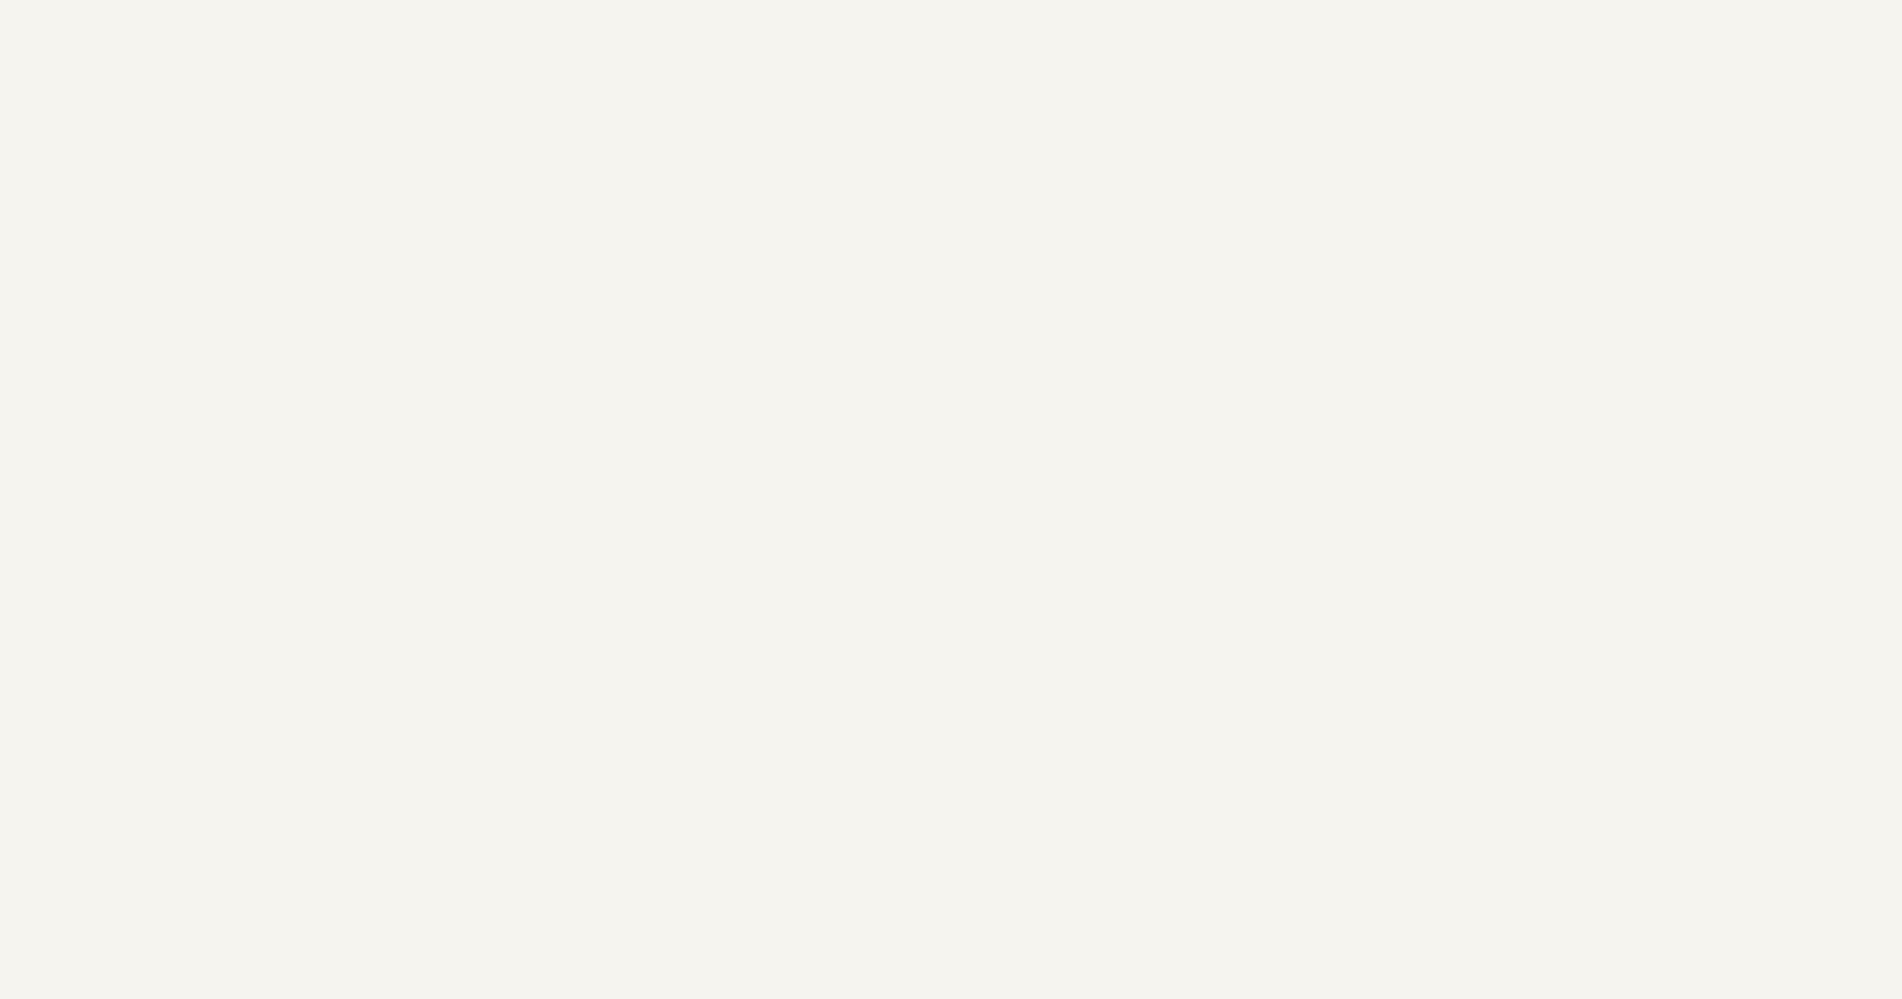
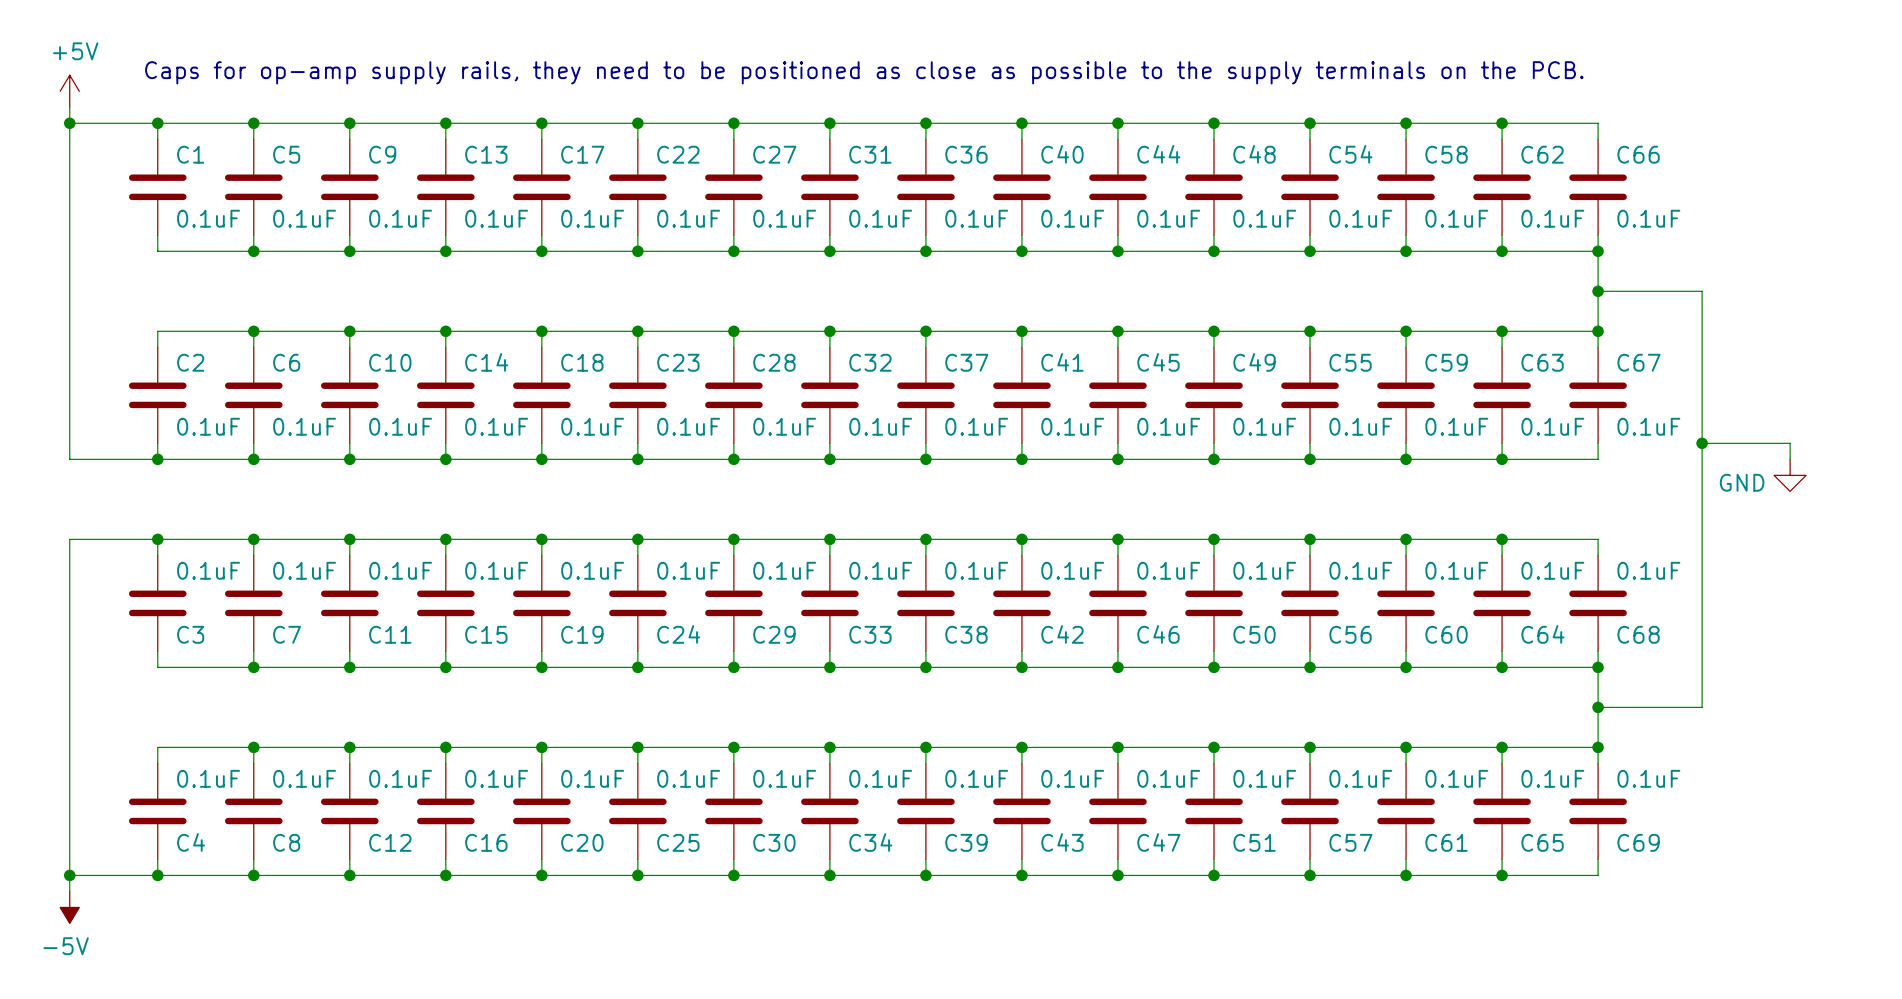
text: none -> Caps for op-amp supply rails, they need to be positioned as close as possible to the supply terminals on the PCB. (864, 72)
power symbol: none -> +5V (69, 91)
wire: none -> (69, 107) (69, 459) (1598, 459) (1598, 443)
wire: none -> (69, 123) (1598, 123) (1598, 139)
junction: none -> (69, 123)
wire: none -> (157, 123) (157, 139)
junction: none -> (157, 123)
wire: none -> (253, 123) (253, 139)
junction: none -> (253, 123)
wire: none -> (349, 123) (349, 139)
junction: none -> (349, 123)
wire: none -> (445, 123) (445, 139)
junction: none -> (445, 123)
wire: none -> (541, 123) (541, 139)
junction: none -> (541, 123)
wire: none -> (637, 123) (637, 139)
junction: none -> (637, 123)
wire: none -> (733, 123) (733, 139)
junction: none -> (733, 123)
wire: none -> (829, 123) (829, 139)
junction: none -> (829, 123)
wire: none -> (925, 123) (925, 139)
junction: none -> (925, 123)
wire: none -> (1021, 123) (1021, 139)
junction: none -> (1021, 123)
wire: none -> (1117, 123) (1117, 139)
junction: none -> (1117, 123)
wire: none -> (1213, 123) (1213, 139)
junction: none -> (1213, 123)
wire: none -> (1310, 123) (1310, 139)
junction: none -> (1310, 123)
wire: none -> (1406, 123) (1406, 139)
junction: none -> (1406, 123)
wire: none -> (1502, 123) (1502, 139)
junction: none -> (1502, 123)
C1: none -> 0.1uF (157, 187)
C5: none -> 0.1uF (253, 187)
C9: none -> 0.1uF (349, 187)
C13: none -> 0.1uF (445, 187)
C17: none -> 0.1uF (541, 187)
C22: none -> 0.1uF (637, 187)
C27: none -> 0.1uF (733, 187)
C31: none -> 0.1uF (829, 187)
C36: none -> 0.1uF (925, 187)
C40: none -> 0.1uF (1021, 187)
C44: none -> 0.1uF (1117, 187)
C48: none -> 0.1uF (1213, 187)
C54: none -> 0.1uF (1310, 187)
C58: none -> 0.1uF (1406, 187)
C62: none -> 0.1uF (1502, 187)
C66: none -> 0.1uF (1598, 187)
wire: none -> (157, 235) (157, 251) (1598, 251)
wire: none -> (253, 235) (253, 251)
wire: none -> (349, 235) (349, 251)
wire: none -> (445, 235) (445, 251)
wire: none -> (541, 235) (541, 251)
wire: none -> (637, 235) (637, 251)
wire: none -> (733, 235) (733, 251)
wire: none -> (829, 235) (829, 251)
wire: none -> (925, 235) (925, 251)
wire: none -> (1021, 235) (1021, 251)
wire: none -> (1117, 235) (1117, 251)
wire: none -> (1213, 235) (1213, 251)
wire: none -> (1310, 235) (1310, 251)
wire: none -> (1406, 235) (1406, 251)
wire: none -> (1502, 235) (1502, 251)
wire: none -> (1598, 235) (1598, 347)
junction: none -> (253, 251)
junction: none -> (349, 251)
junction: none -> (445, 251)
junction: none -> (541, 251)
junction: none -> (637, 251)
junction: none -> (733, 251)
junction: none -> (829, 251)
junction: none -> (925, 251)
junction: none -> (1021, 251)
junction: none -> (1117, 251)
junction: none -> (1213, 251)
junction: none -> (1310, 251)
junction: none -> (1406, 251)
junction: none -> (1502, 251)
junction: none -> (1598, 251)
wire: none -> (1598, 291) (1702, 291) (1702, 707) (1598, 707)
junction: none -> (1598, 291)
wire: none -> (253, 331) (253, 347)
junction: none -> (253, 331)
wire: none -> (349, 331) (349, 347)
junction: none -> (349, 331)
wire: none -> (445, 331) (445, 347)
junction: none -> (445, 331)
wire: none -> (541, 331) (541, 347)
junction: none -> (541, 331)
wire: none -> (637, 331) (637, 347)
junction: none -> (637, 331)
wire: none -> (733, 331) (733, 347)
junction: none -> (733, 331)
wire: none -> (829, 331) (829, 347)
junction: none -> (829, 331)
wire: none -> (925, 331) (925, 347)
junction: none -> (925, 331)
wire: none -> (1021, 331) (1021, 347)
junction: none -> (1021, 331)
wire: none -> (1117, 331) (1117, 347)
junction: none -> (1117, 331)
wire: none -> (1213, 331) (1213, 347)
junction: none -> (1213, 331)
wire: none -> (1310, 331) (1310, 347)
junction: none -> (1310, 331)
wire: none -> (1406, 331) (1406, 347)
junction: none -> (1406, 331)
wire: none -> (1502, 331) (1502, 347)
junction: none -> (1502, 331)
wire: none -> (1598, 331) (157, 331) (157, 347)
junction: none -> (1598, 331)
C2: none -> 0.1uF (157, 395)
C6: none -> 0.1uF (253, 395)
C10: none -> 0.1uF (349, 395)
C14: none -> 0.1uF (445, 395)
C18: none -> 0.1uF (541, 395)
C23: none -> 0.1uF (637, 395)
C28: none -> 0.1uF (733, 395)
C32: none -> 0.1uF (829, 395)
C37: none -> 0.1uF (925, 395)
C41: none -> 0.1uF (1021, 395)
C45: none -> 0.1uF (1117, 395)
C49: none -> 0.1uF (1213, 395)
C55: none -> 0.1uF (1310, 395)
C59: none -> 0.1uF (1406, 395)
C63: none -> 0.1uF (1502, 395)
C67: none -> 0.1uF (1598, 395)
wire: none -> (157, 443) (157, 459)
wire: none -> (253, 443) (253, 459)
wire: none -> (349, 443) (349, 459)
wire: none -> (445, 443) (445, 459)
wire: none -> (541, 443) (541, 459)
wire: none -> (637, 443) (637, 459)
wire: none -> (733, 443) (733, 459)
wire: none -> (829, 443) (829, 459)
wire: none -> (925, 443) (925, 459)
wire: none -> (1021, 443) (1021, 459)
wire: none -> (1117, 443) (1117, 459)
wire: none -> (1213, 443) (1213, 459)
wire: none -> (1310, 443) (1310, 459)
wire: none -> (1406, 443) (1406, 459)
wire: none -> (1502, 443) (1502, 459)
wire: none -> (1702, 443) (1790, 443) (1790, 459)
junction: none -> (1702, 443)
junction: none -> (157, 459)
junction: none -> (253, 459)
junction: none -> (349, 459)
junction: none -> (445, 459)
junction: none -> (541, 459)
junction: none -> (637, 459)
junction: none -> (733, 459)
junction: none -> (829, 459)
junction: none -> (925, 459)
junction: none -> (1021, 459)
junction: none -> (1117, 459)
junction: none -> (1213, 459)
junction: none -> (1310, 459)
junction: none -> (1406, 459)
junction: none -> (1502, 459)
power symbol: none -> GND (1790, 475)
wire: none -> (157, 539) (157, 555)
junction: none -> (157, 539)
wire: none -> (253, 539) (253, 555)
junction: none -> (253, 539)
wire: none -> (349, 539) (349, 555)
junction: none -> (349, 539)
wire: none -> (445, 539) (445, 555)
junction: none -> (445, 539)
wire: none -> (541, 539) (541, 555)
junction: none -> (541, 539)
wire: none -> (637, 539) (637, 555)
junction: none -> (637, 539)
wire: none -> (733, 539) (733, 555)
junction: none -> (733, 539)
wire: none -> (829, 539) (829, 555)
junction: none -> (829, 539)
wire: none -> (925, 539) (925, 555)
junction: none -> (925, 539)
wire: none -> (1021, 539) (1021, 555)
junction: none -> (1021, 539)
wire: none -> (1117, 539) (1117, 555)
junction: none -> (1117, 539)
wire: none -> (1213, 539) (1213, 555)
junction: none -> (1213, 539)
wire: none -> (1310, 539) (1310, 555)
junction: none -> (1310, 539)
wire: none -> (1406, 539) (1406, 555)
junction: none -> (1406, 539)
wire: none -> (1502, 539) (1502, 555)
junction: none -> (1502, 539)
wire: none -> (1598, 555) (1598, 539) (69, 539) (69, 891)
C3: none -> 0.1uF (157, 603)
C7: none -> 0.1uF (253, 603)
C11: none -> 0.1uF (349, 603)
C15: none -> 0.1uF (445, 603)
C19: none -> 0.1uF (541, 603)
C24: none -> 0.1uF (637, 603)
C29: none -> 0.1uF (733, 603)
C33: none -> 0.1uF (829, 603)
C38: none -> 0.1uF (925, 603)
C42: none -> 0.1uF (1021, 603)
C46: none -> 0.1uF (1117, 603)
C50: none -> 0.1uF (1213, 603)
C56: none -> 0.1uF (1310, 603)
C60: none -> 0.1uF (1406, 603)
C64: none -> 0.1uF (1502, 603)
C68: none -> 0.1uF (1598, 603)
wire: none -> (157, 651) (157, 667) (1598, 667)
wire: none -> (253, 651) (253, 667)
wire: none -> (349, 651) (349, 667)
wire: none -> (445, 651) (445, 667)
wire: none -> (541, 651) (541, 667)
wire: none -> (637, 651) (637, 667)
wire: none -> (733, 651) (733, 667)
wire: none -> (829, 651) (829, 667)
wire: none -> (925, 651) (925, 667)
wire: none -> (1021, 651) (1021, 667)
wire: none -> (1117, 651) (1117, 667)
wire: none -> (1213, 651) (1213, 667)
wire: none -> (1310, 651) (1310, 667)
wire: none -> (1406, 651) (1406, 667)
wire: none -> (1502, 651) (1502, 667)
wire: none -> (1598, 651) (1598, 763)
junction: none -> (253, 667)
junction: none -> (349, 667)
junction: none -> (445, 667)
junction: none -> (541, 667)
junction: none -> (637, 667)
junction: none -> (733, 667)
junction: none -> (829, 667)
junction: none -> (925, 667)
junction: none -> (1021, 667)
junction: none -> (1117, 667)
junction: none -> (1213, 667)
junction: none -> (1310, 667)
junction: none -> (1406, 667)
junction: none -> (1502, 667)
junction: none -> (1598, 667)
junction: none -> (1598, 707)
wire: none -> (253, 747) (253, 763)
junction: none -> (253, 747)
wire: none -> (349, 747) (349, 763)
junction: none -> (349, 747)
wire: none -> (445, 747) (445, 763)
junction: none -> (445, 747)
wire: none -> (541, 747) (541, 763)
junction: none -> (541, 747)
wire: none -> (637, 747) (637, 763)
junction: none -> (637, 747)
wire: none -> (733, 747) (733, 763)
junction: none -> (733, 747)
wire: none -> (829, 747) (829, 763)
junction: none -> (829, 747)
wire: none -> (925, 747) (925, 763)
junction: none -> (925, 747)
wire: none -> (1021, 747) (1021, 763)
junction: none -> (1021, 747)
wire: none -> (1117, 747) (1117, 763)
junction: none -> (1117, 747)
wire: none -> (1213, 747) (1213, 763)
junction: none -> (1213, 747)
wire: none -> (1310, 747) (1310, 763)
junction: none -> (1310, 747)
wire: none -> (1406, 747) (1406, 763)
junction: none -> (1406, 747)
wire: none -> (1502, 747) (1502, 763)
junction: none -> (1502, 747)
wire: none -> (1598, 747) (157, 747) (157, 763)
junction: none -> (1598, 747)
C4: none -> 0.1uF (157, 811)
C8: none -> 0.1uF (253, 811)
C12: none -> 0.1uF (349, 811)
C16: none -> 0.1uF (445, 811)
C20: none -> 0.1uF (541, 811)
C25: none -> 0.1uF (637, 811)
C30: none -> 0.1uF (733, 811)
C34: none -> 0.1uF (829, 811)
C39: none -> 0.1uF (925, 811)
C43: none -> 0.1uF (1021, 811)
C47: none -> 0.1uF (1117, 811)
C51: none -> 0.1uF (1213, 811)
C57: none -> 0.1uF (1310, 811)
C61: none -> 0.1uF (1406, 811)
C65: none -> 0.1uF (1502, 811)
C69: none -> 0.1uF (1598, 811)
wire: none -> (157, 859) (157, 875)
wire: none -> (253, 859) (253, 875)
wire: none -> (349, 859) (349, 875)
wire: none -> (445, 859) (445, 875)
wire: none -> (541, 859) (541, 875)
wire: none -> (637, 859) (637, 875)
wire: none -> (733, 859) (733, 875)
wire: none -> (829, 859) (829, 875)
wire: none -> (925, 859) (925, 875)
wire: none -> (1021, 859) (1021, 875)
wire: none -> (1117, 859) (1117, 875)
wire: none -> (1213, 859) (1213, 875)
wire: none -> (1310, 859) (1310, 875)
wire: none -> (1406, 859) (1406, 875)
wire: none -> (1502, 859) (1502, 875)
wire: none -> (1598, 859) (1598, 875) (69, 875)
junction: none -> (69, 875)
junction: none -> (157, 875)
junction: none -> (253, 875)
junction: none -> (349, 875)
junction: none -> (445, 875)
junction: none -> (541, 875)
junction: none -> (637, 875)
junction: none -> (733, 875)
junction: none -> (829, 875)
junction: none -> (925, 875)
junction: none -> (1021, 875)
junction: none -> (1117, 875)
junction: none -> (1213, 875)
junction: none -> (1310, 875)
junction: none -> (1406, 875)
junction: none -> (1502, 875)
power symbol: none -> -5V (69, 907)

